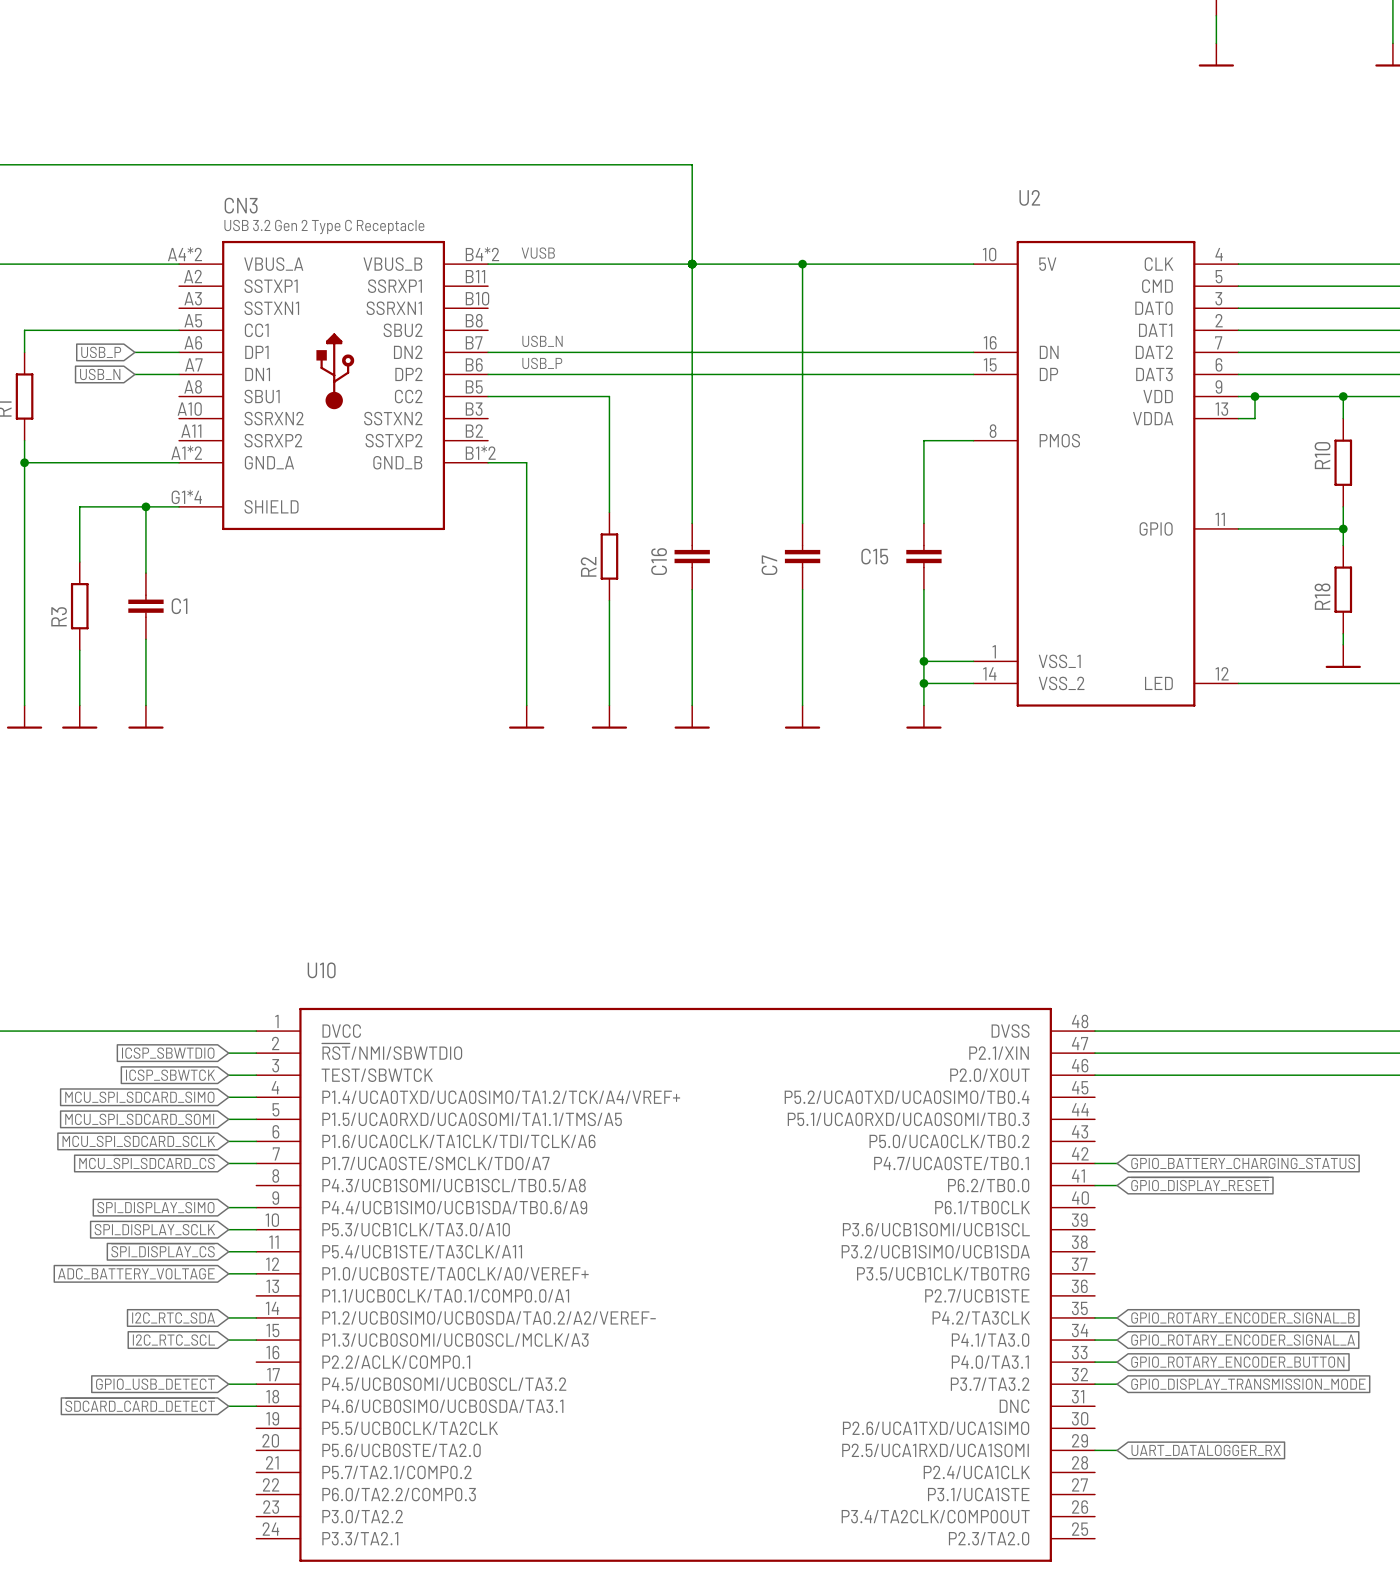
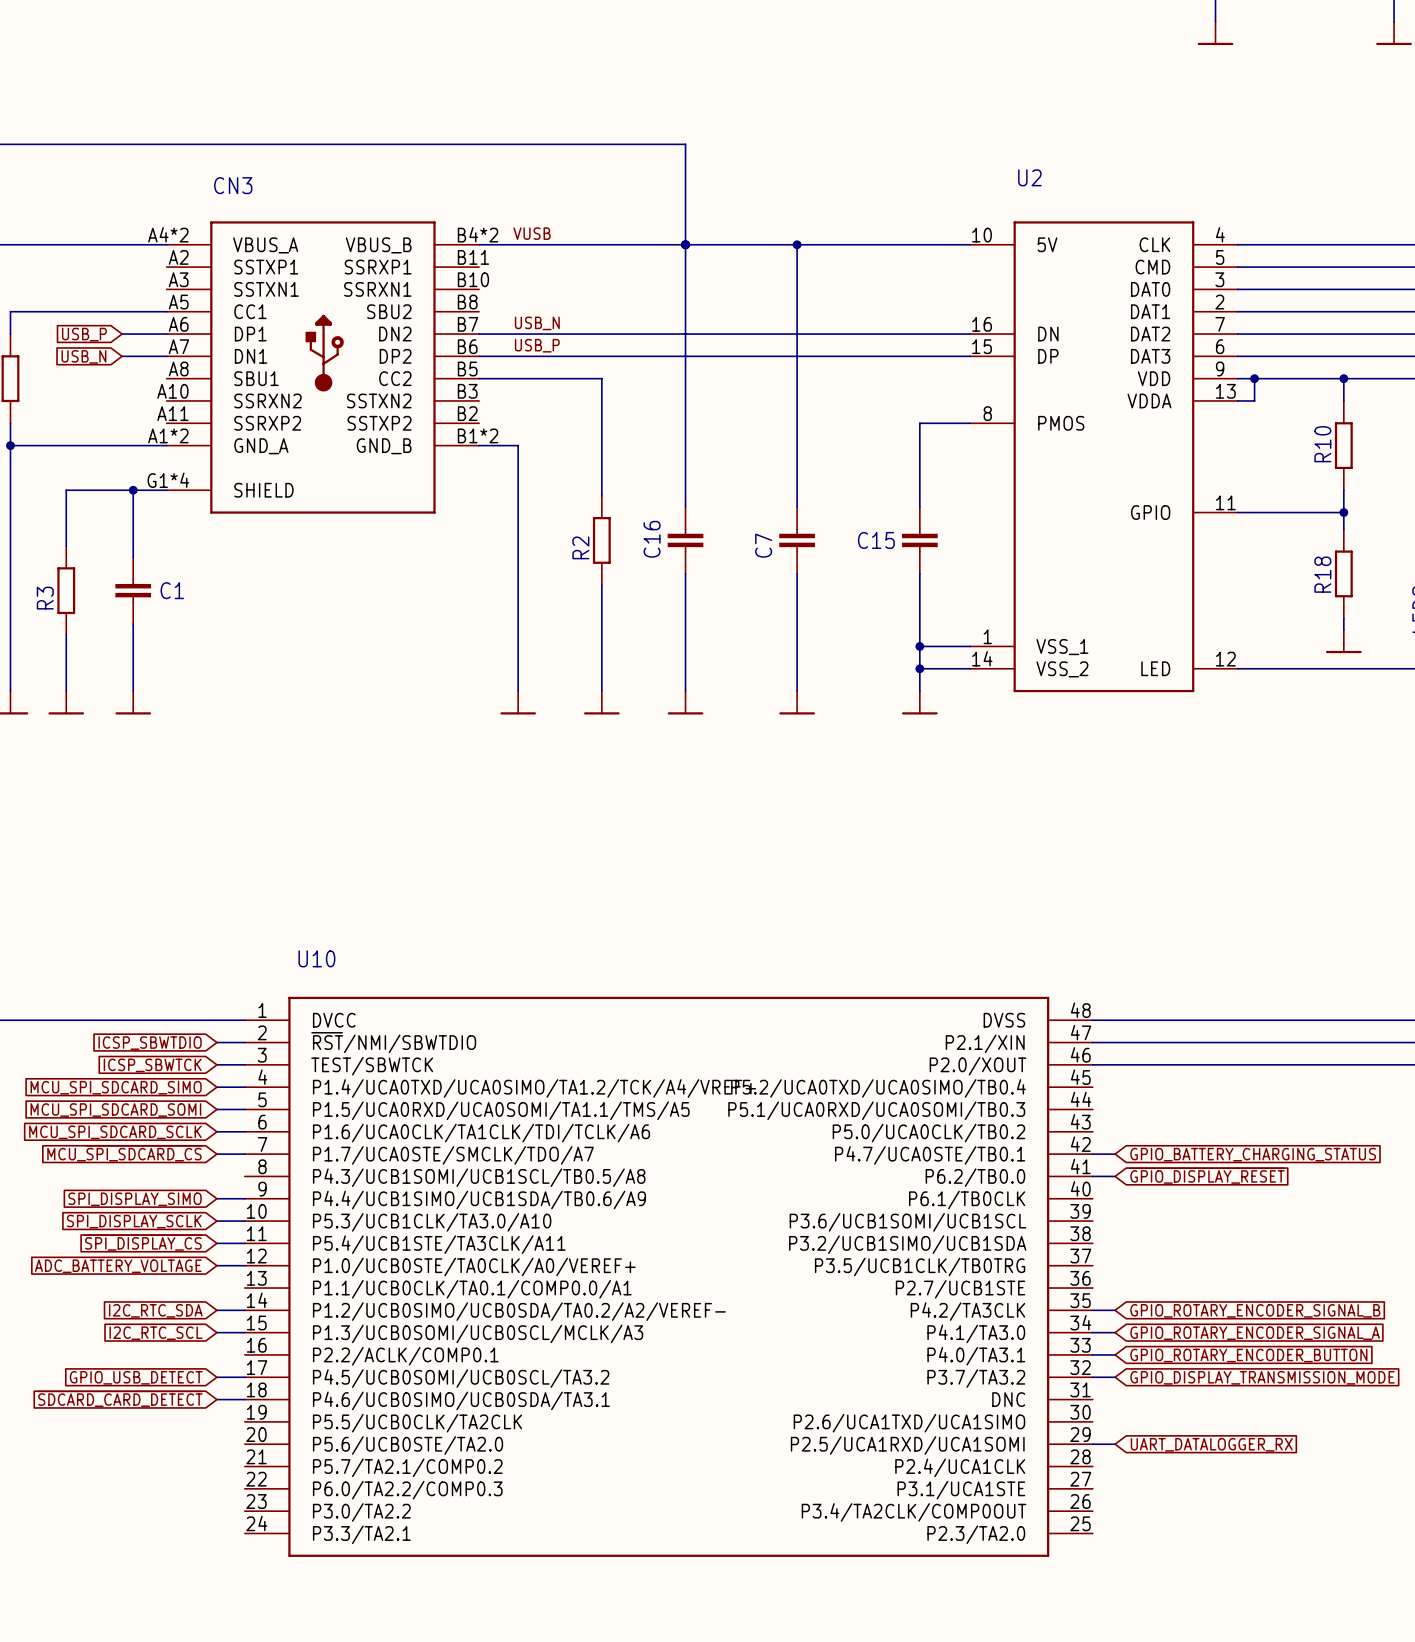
CN3 value: USB 3.2 Gen 2 Type C Receptacle (324, 227) -> none

